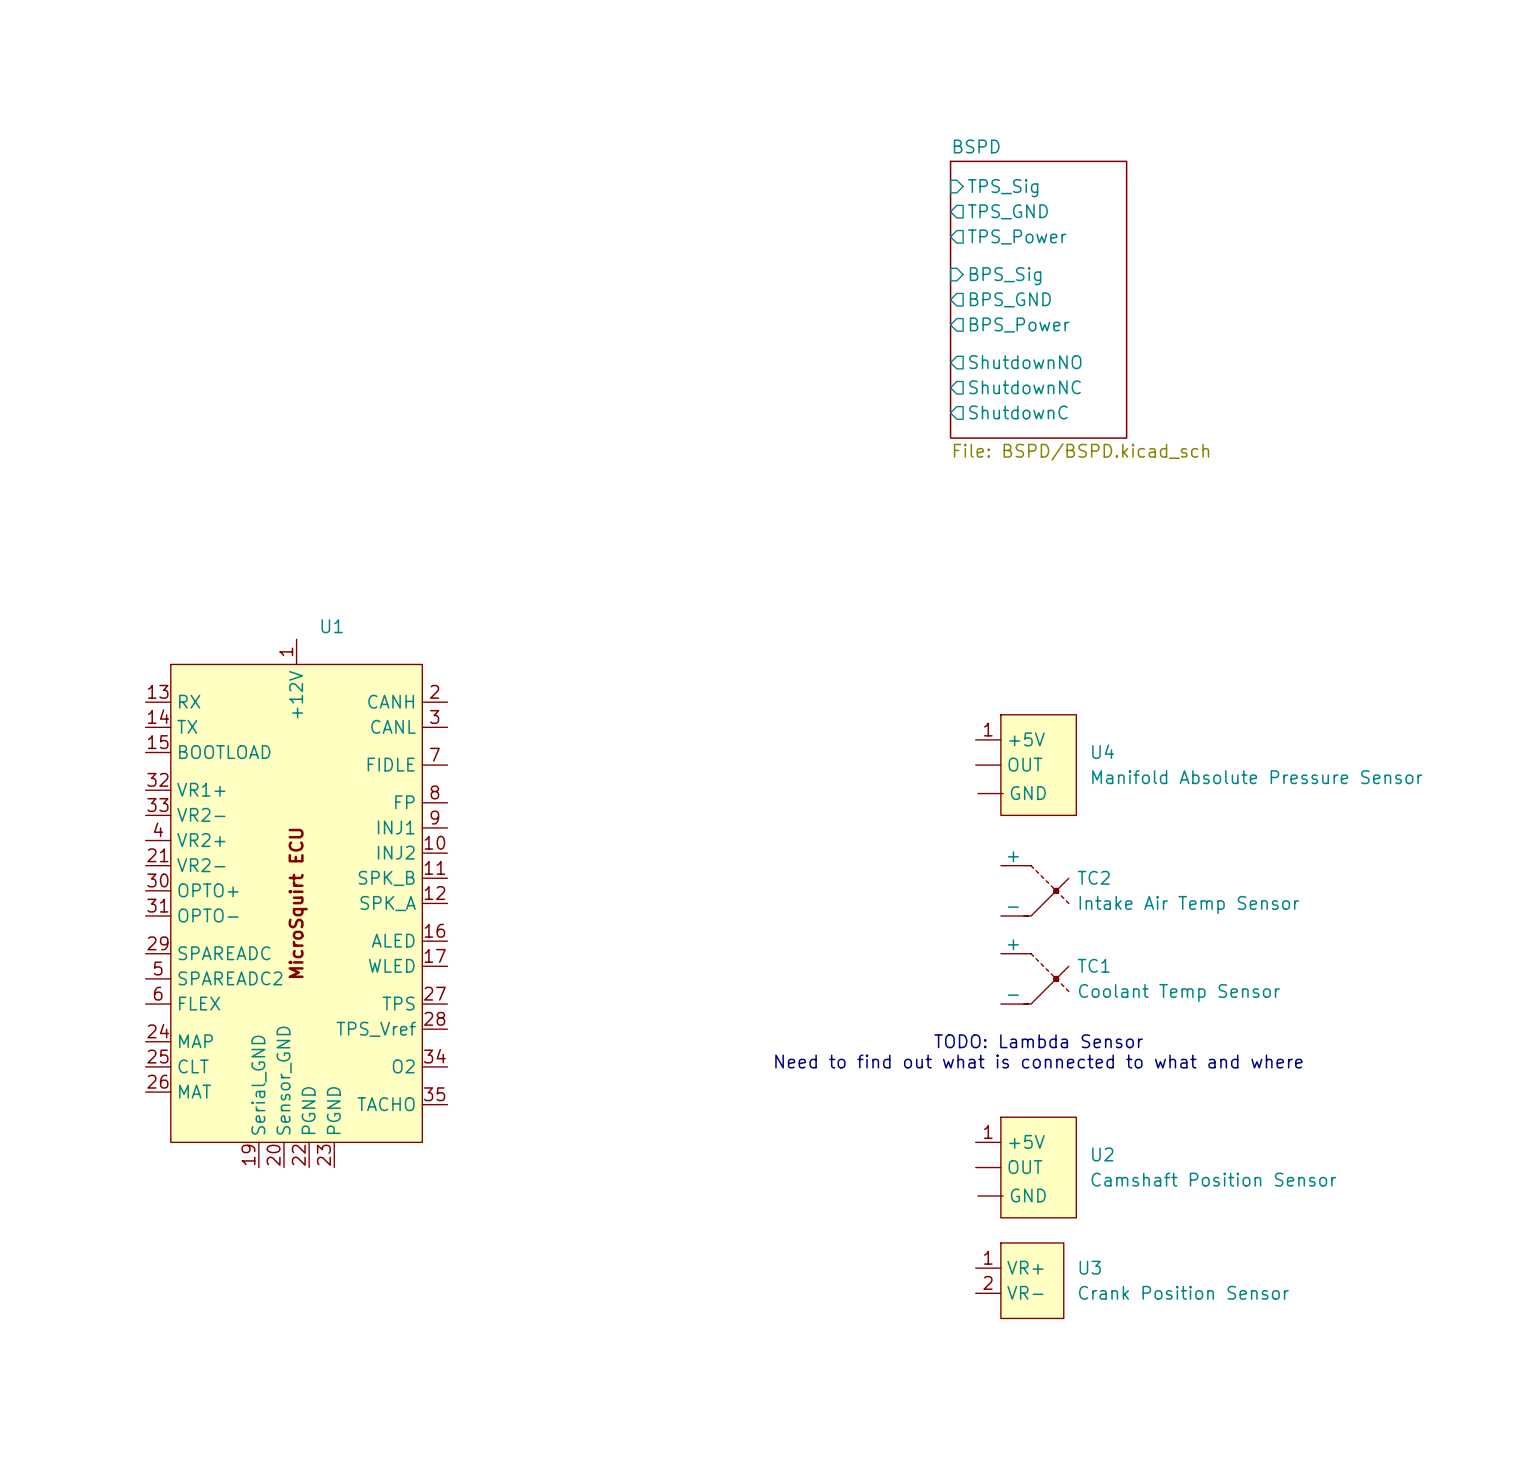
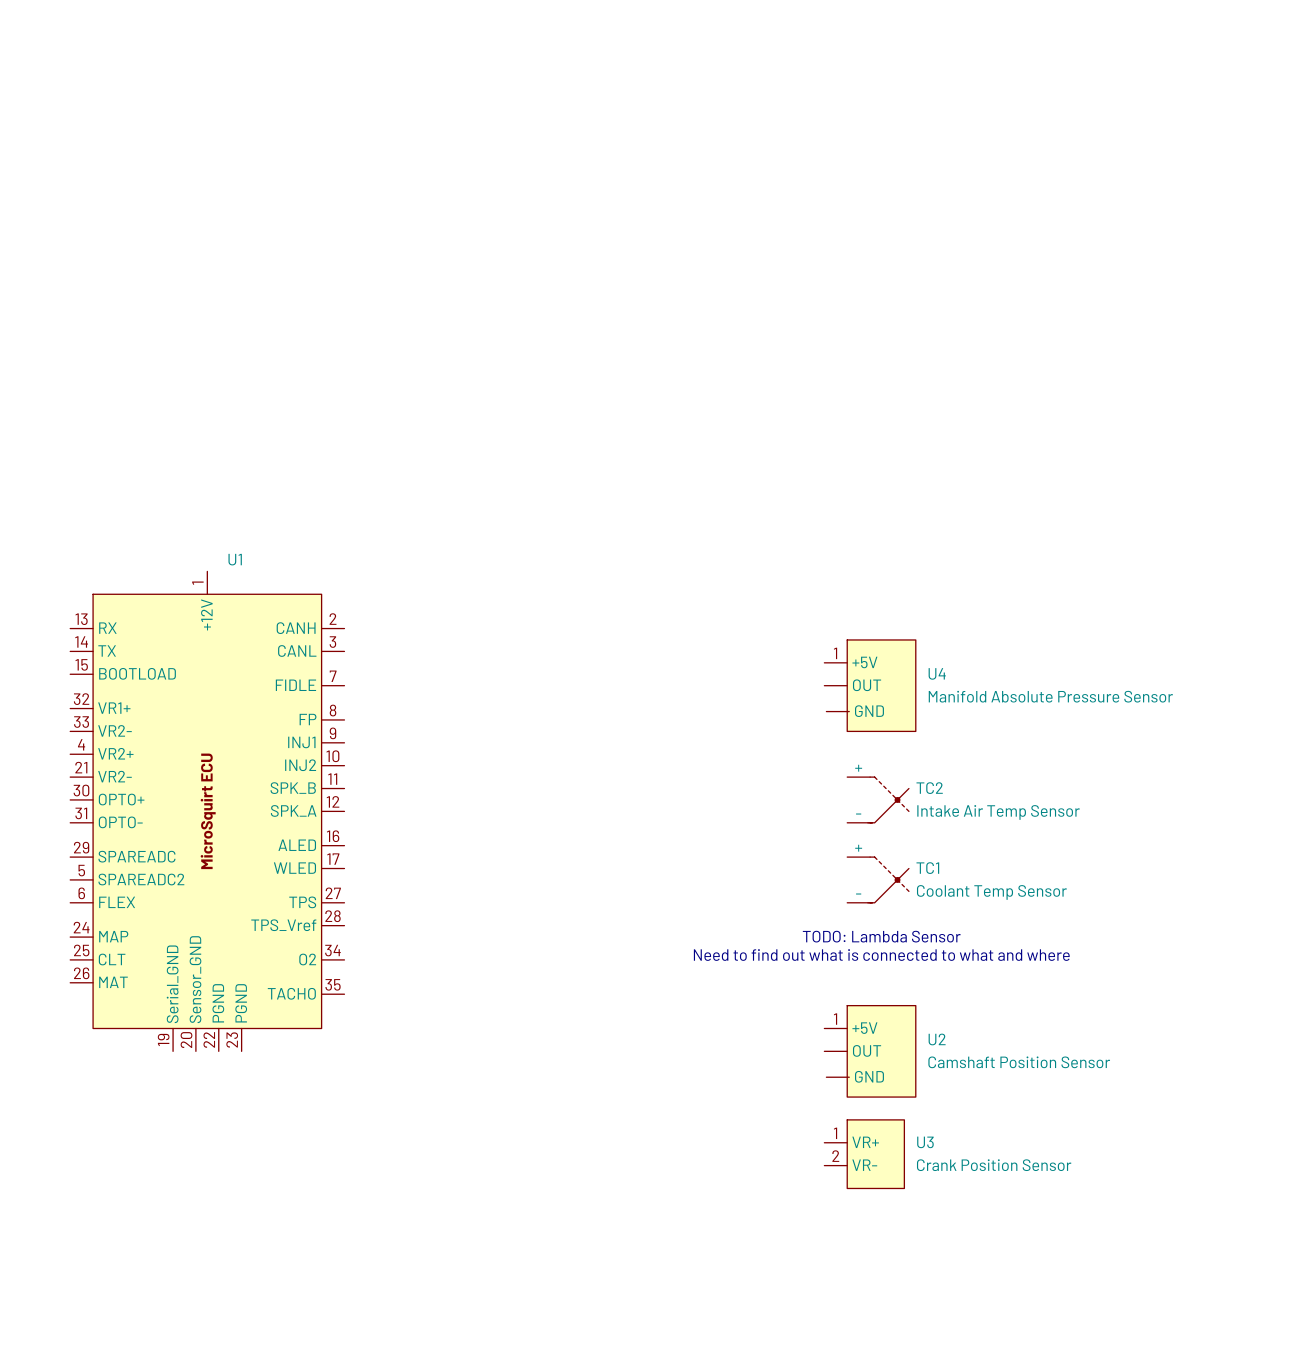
sheet pin: TPS_Sig (1003, 188) -> none
sheet pin: TPS_GND (1007, 211) -> none
sheet pin: TPS_Power (1017, 236) -> none
sheet pin: BPS_Sig (1005, 276) -> none
sheet pin: BPS_GND (1010, 299) -> none
sheet BSPD: File: BSPD/BSPD.kicad_sch (1038, 299) -> none
sheet pin: BPS_Power (1019, 325) -> none
sheet pin: ShutdownNO (1025, 362) -> none
sheet pin: ShutdownNC (1025, 387) -> none
sheet pin: ShutdownC (1018, 412) -> none

